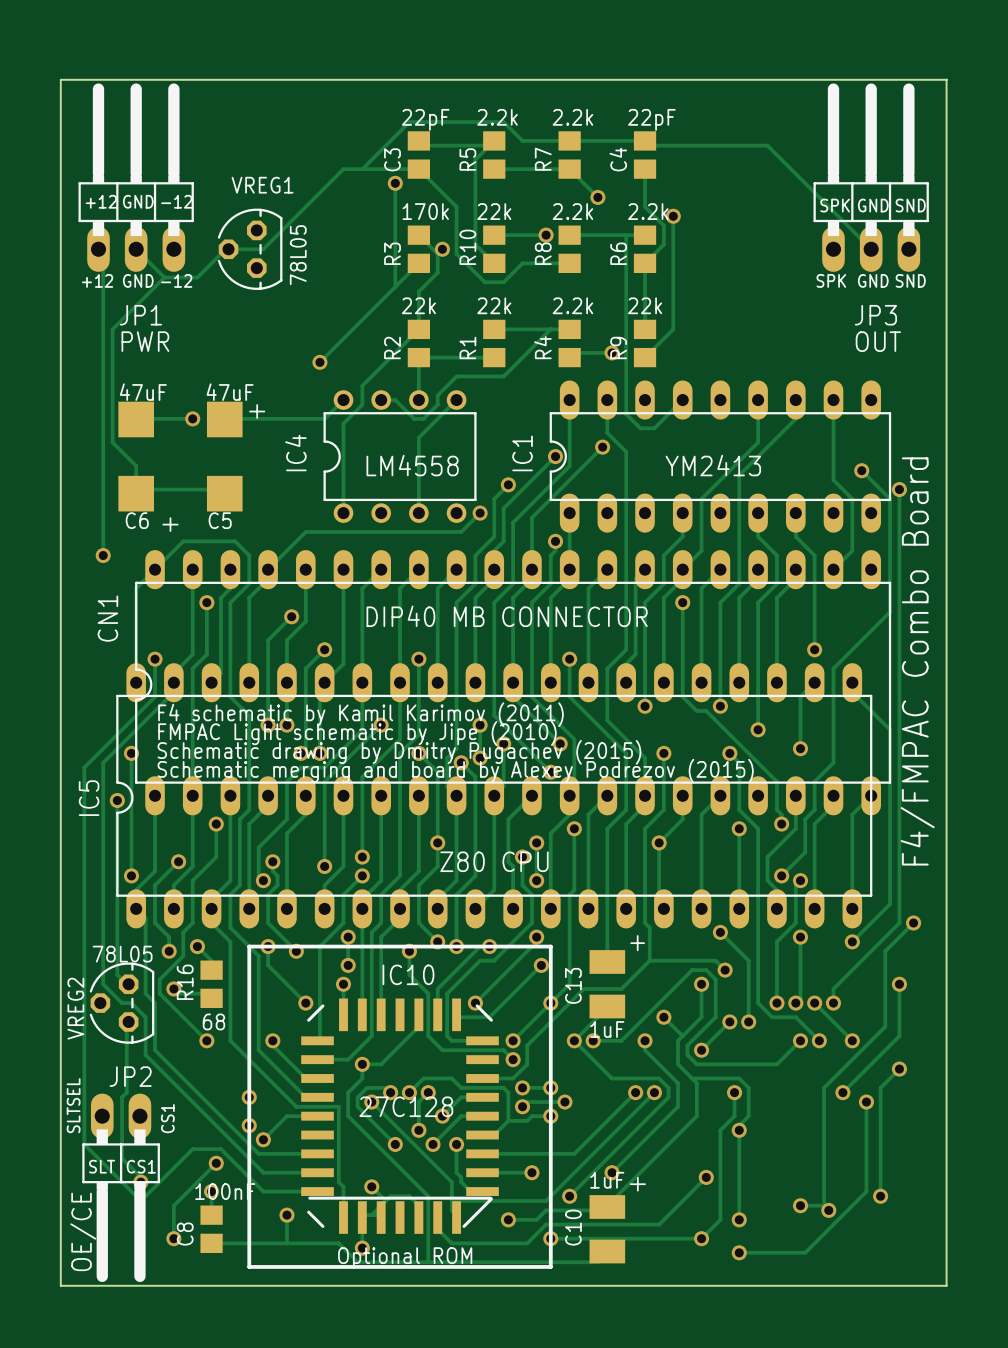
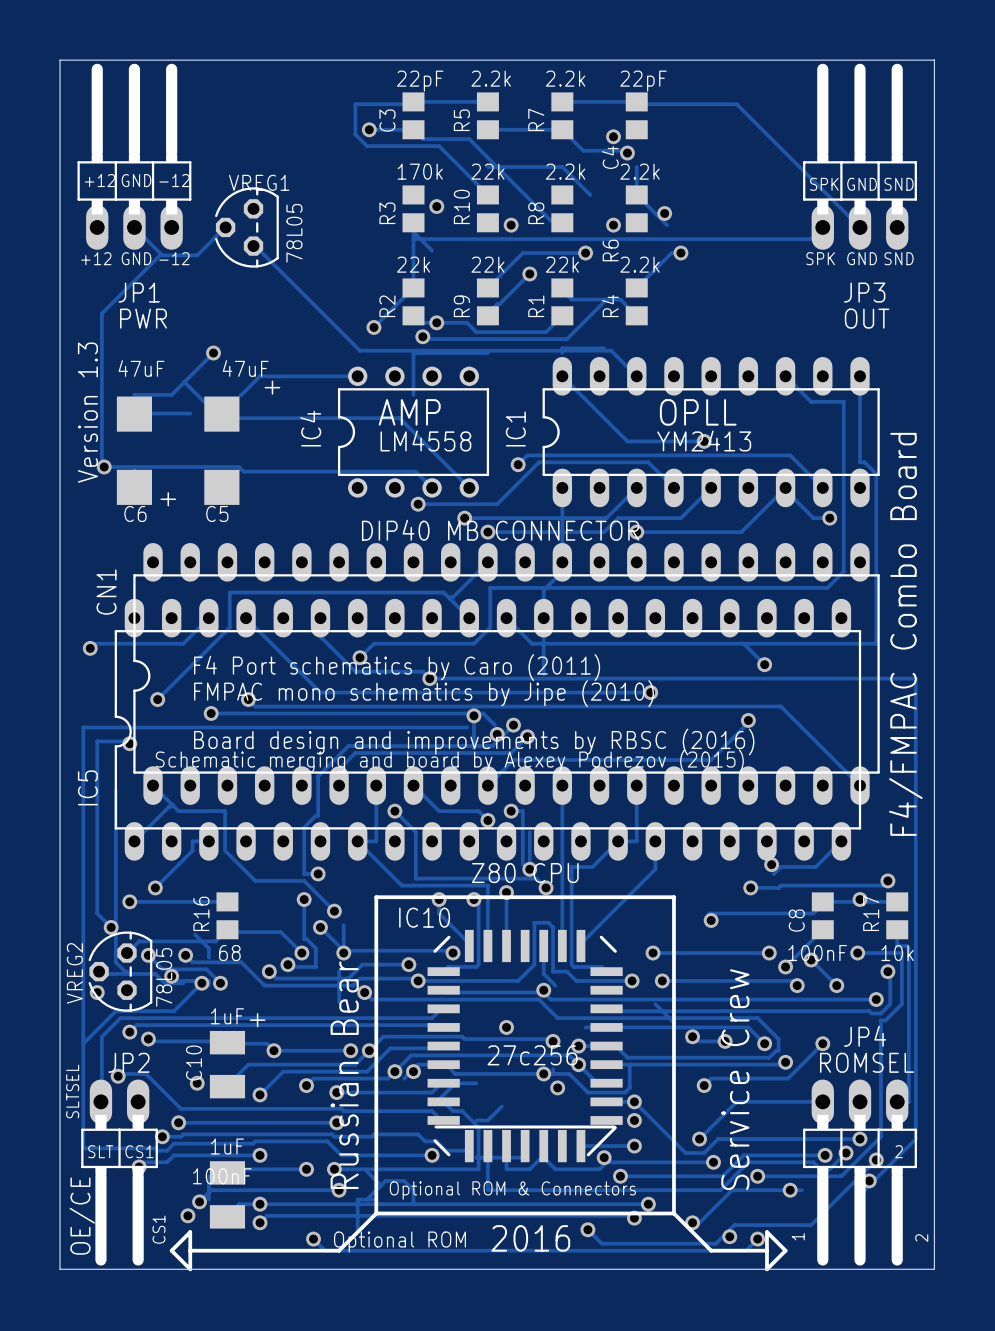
board edge: none -> (934, 60) (934, 78)
board edge: (60, 79) (946, 79) -> (60, 78) (60, 60) (934, 60)
text: none -> 2.2k (565, 78)
track: none -> (487, 101) (355, 104) (355, 134) (366, 146) (439, 146) (487, 194)
track: none -> (562, 101) (736, 104) (860, 227)
part: none -> (413, 115)
part: none -> (487, 115)
text position: 2.2k (497, 117) -> 2.2k (491, 78)
part: none -> (562, 115)
text: 2.2k (572, 117) -> none
part: none -> (636, 115)
text position: 22pF (425, 119) -> 22pF (420, 81)
text position: 22pF (651, 119) -> 22pF (643, 81)
track: none -> (369, 129) (413, 129) (422, 139) (469, 139) (550, 220) (562, 220) (562, 222)
via: none -> (369, 129)
track: none -> (487, 129) (562, 129) (583, 150) (625, 150) (627, 153)
via: none -> (613, 136)
track: (418, 140) (418, 145) (489, 145) (494, 140) (475, 159) (475, 244) (489, 258) (494, 258) (494, 263) -> none
part: (418, 155) -> none
part: (494, 155) -> none
part: (569, 155) -> none
via: none -> (627, 153)
part: (645, 155) -> none
text position: C3 (392, 159) -> C3 (387, 120)
text position: R5 (467, 159) -> R5 (461, 120)
text position: R7 (543, 159) -> R7 (536, 119)
track: (362, 169) (409, 122) (503, 122) (522, 140) (645, 140) (645, 145) (767, 145) (871, 249) -> none
text: none -> 22k (487, 171)
text: none -> 2.2k (565, 171)
text: none -> 2.2k (639, 171)
part position: (136, 177) -> (134, 156)
part position: (871, 177) -> (860, 156)
track: (395, 183) (395, 286) -> none
via: (395, 183) -> none
via: (597, 197) -> none
track: (645, 199) (645, 206) (663, 225) (663, 244) (645, 263) (645, 317) -> (636, 197) (639, 197) (666, 225)
text position: +12 (101, 201) -> +12 (100, 180)
text position: GND (138, 201) -> GND (136, 180)
text position: -12 (176, 201) -> -12 (174, 180)
text position: SPK (835, 205) -> SPK (824, 184)
text position: GND (873, 205) -> GND (862, 184)
text position: SND (910, 205) -> SND (899, 184)
via: none -> (436, 206)
part: none -> (413, 208)
text position: 170k (425, 211) -> 170k (420, 171)
text: 22k (494, 211) -> none
part: none -> (487, 208)
part: none -> (562, 208)
text: 2.2k (572, 211) -> none
part: none -> (636, 208)
text: 2.2k (648, 211) -> none
track: (673, 216) (673, 329) (649, 352) (645, 352) (645, 357) -> none
via: none -> (511, 225)
via: none -> (613, 225)
track: none -> (134, 227) (162, 255) (197, 255) (225, 227)
track: none -> (822, 227) (811, 239) (413, 239)
track: (494, 235) (546, 235) -> none
via: (546, 235) -> none
track: (569, 235) (645, 235) -> none
track: (626, 235) (626, 414) (640, 428) (654, 428) (682, 400) -> none
text position: R10 (467, 247) -> R10 (461, 206)
track: (98, 249) (103, 253) (103, 317) -> (161, 254) (101, 313)
track: (136, 249) (164, 277) -> none
part position: (250, 249) -> (246, 227)
track: (256, 249) (225, 249) (197, 277) (164, 277) -> none
track: (258, 249) (263, 249) (343, 169) (418, 169) (456, 206) (456, 253) (484, 282) (503, 282) -> (255, 246) (360, 350) (611, 350) (636, 376)
part: (418, 249) -> none
track: (442, 249) (437, 253) (437, 272) (418, 291) -> (413, 222) (413, 287)
via: (442, 249) -> none
part: (494, 249) -> none
part: (569, 249) -> none
part: (645, 249) -> none
text position: R3 (392, 253) -> R3 (387, 213)
text position: R8 (543, 253) -> R8 (536, 213)
text position: 78L05 (298, 255) -> 78L05 (294, 233)
via: none -> (585, 253)
track: none -> (680, 253) (671, 253) (636, 287)
via: none -> (680, 253)
track: (418, 263) (319, 362) -> none
track: (522, 263) (569, 263) -> (515, 260) (522, 253) (585, 253)
text: none -> 22k (487, 264)
text: none -> 22k (562, 264)
text: none -> 2.2k (639, 264)
track: (164, 277) (112, 329) (112, 442) (136, 465) (136, 473) -> none
track: none -> (529, 273) (499, 304) (497, 304) (487, 315)
via: none -> (529, 273)
text position: +12 (97, 280) -> +12 (96, 258)
text position: GND (138, 280) -> GND (136, 258)
text position: -12 (176, 280) -> -12 (174, 258)
text position: SPK (831, 280) -> SPK (820, 258)
text position: GND (873, 280) -> GND (862, 258)
text position: SND (910, 280) -> SND (899, 258)
track: none -> (562, 287) (571, 299) (620, 299) (634, 313) (636, 313)
track: (418, 294) (418, 329) (362, 385) (362, 404) (343, 423) (343, 513) -> (413, 290) (411, 290) (373, 327)
track: none -> (606, 299) (566, 339) (425, 339) (422, 336)
text position: 22k (418, 305) -> 22k (413, 264)
part: none -> (413, 301)
text: 22k (494, 305) -> none
part: none -> (487, 301)
part: none -> (562, 301)
text: 2.2k (572, 305) -> none
text: 22k (645, 305) -> none
part: none -> (636, 301)
text position: JP1 (140, 315) -> JP1 (139, 292)
text position: JP3 (875, 315) -> JP3 (864, 292)
track: none -> (413, 315) (420, 322) (466, 322) (476, 332) (546, 332) (562, 315)
via: none -> (436, 322)
track: (494, 329) (569, 329) -> none
track: (550, 329) (503, 376) (456, 376) (437, 395) (437, 404) (423, 418) (414, 418) (395, 400) (381, 400) -> none
via: none -> (373, 327)
text position: PWR (145, 341) -> PWR (143, 318)
via: none -> (422, 336)
text position: OUT (878, 341) -> OUT (867, 318)
part: (418, 343) -> none
part: (494, 343) -> none
part: (569, 343) -> none
part: (645, 343) -> none
text position: R2 (392, 347) -> R2 (387, 306)
text position: R1 (467, 347) -> R1 (536, 306)
text position: R4 (542, 347) -> R4 (610, 305)
text position: R9 (618, 347) -> R9 (461, 306)
via: (612, 352) -> none
track: none -> (213, 353) (171, 394) (134, 395)
via: none -> (213, 353)
via: (319, 362) -> none
track: none -> (357, 376) (260, 376) (240, 395)
track: none -> (562, 376) (627, 441) (704, 441)
track: none -> (785, 376) (811, 401) (843, 401) (843, 571) (827, 587) (490, 587) (490, 627) (473, 643) (373, 643) (360, 657)
track: none -> (860, 376) (860, 462) (864, 462) (876, 473) (876, 643) (744, 644)
track: none -> (184, 382) (220, 418) (399, 418) (469, 487)
text position: 47uF (143, 392) -> 47uF (141, 368)
text position: 47uF (230, 392) -> 47uF (245, 368)
track: (343, 400) (324, 418) (224, 419) -> none
track: (456, 400) (418, 437) (418, 513) -> none
track: (569, 400) (569, 465) (513, 522) (513, 583) (494, 602) (494, 715) (550, 772) -> none
track: (607, 400) (607, 433) (626, 451) (626, 649) (607, 668) (607, 720) (645, 758) (645, 795) -> none
track: (758, 400) (758, 442) (701, 498) (701, 550) (682, 569) (682, 579) (663, 597) (663, 682) -> none
track: (795, 400) (795, 418) (739, 475) (739, 583) (720, 602) (720, 706) -> none
track: (833, 400) (833, 480) (852, 498) (852, 550) (833, 569) -> none
text position: + (257, 411) -> + (272, 387)
text: none -> Version 1.3 (87, 412)
text: none -> AMP (409, 412)
text: none -> OPLL (698, 412)
via: (192, 418) -> none
track: (602, 447) (531, 517) (531, 579) (513, 597) (513, 696) (560, 743) -> none
via: (602, 447) -> none
via: none -> (704, 441)
text position: IC4 (295, 453) -> IC4 (310, 428)
text position: IC1 (522, 453) -> IC1 (515, 429)
part position: (400, 456) -> (413, 432)
track: (555, 456) (503, 508) (503, 541) (494, 550) (494, 579) (475, 597) (475, 682) -> none
via: (555, 456) -> none
part position: (720, 456) -> (711, 432)
text position: LM4558 (412, 465) -> LM4558 (425, 440)
text position: YM2413 (713, 465) -> YM2413 (704, 440)
track: none -> (518, 464) (527, 455) (790, 455) (822, 487)
via: none -> (518, 464)
track: (861, 470) (890, 498) (890, 612) (833, 668) (833, 762) (814, 781) (814, 809) (805, 819) (805, 852) (781, 875) -> none
via: (861, 470) -> none
track: (103, 473) (103, 555) -> (101, 466) (239, 466) (243, 471) (415, 471) (432, 487)
via: none -> (104, 466)
track: (508, 484) (494, 498) (494, 536) (475, 555) (475, 583) (456, 602) (456, 748) (447, 758) (447, 786) (456, 795) (456, 880) (437, 899) (437, 908) -> none
via: (508, 484) -> none
track: (136, 489) (221, 489) (224, 493) -> none
track: (899, 489) (899, 923) (833, 988) (833, 1003) -> none
via: (899, 489) -> none
track: none -> (636, 487) (606, 518) (464, 518)
track: none -> (673, 487) (648, 462) (539, 462) (497, 504) (418, 504)
track: none -> (711, 487) (680, 518) (618, 518) (604, 532) (487, 532)
via: none -> (418, 504)
track: (480, 513) (461, 531) (305, 531) (268, 569) (268, 579) (249, 597) (249, 682) -> none
via: (480, 513) -> none
track: (682, 513) (682, 536) (663, 555) (663, 583) (645, 602) (645, 706) -> none
track: (758, 513) (758, 536) (776, 555) (776, 583) (758, 602) (758, 729) -> none
track: (795, 513) (795, 536) (814, 555) (814, 649) -> none
text position: + (170, 524) -> + (168, 499)
via: none -> (464, 518)
track: none -> (829, 518) (813, 518) (785, 490) (785, 487) (741, 532) (636, 532)
via: none -> (829, 518)
via: none -> (487, 532)
via: none -> (636, 532)
track: (555, 541) (555, 550) (550, 555) (550, 583) (531, 602) (531, 696) (574, 739) (574, 791) (569, 795) -> none
via: (555, 541) -> none
via: (103, 555) -> none
track: (192, 569) (192, 654) (173, 673) (173, 692) (103, 762) (103, 984) (122, 1003) (131, 1003) (145, 1017) (145, 1054) (263, 1172) (317, 1172) -> none
track: (230, 569) (230, 588) (221, 597) (221, 673) (211, 682) -> none
track: (305, 569) (305, 621) (286, 640) (286, 725) -> none
track: (343, 569) (343, 663) (319, 687) (319, 753) -> none
track: (381, 569) (362, 588) (362, 729) (324, 767) (301, 767) (286, 781) (286, 819) (258, 847) (258, 875) (263, 880) -> none
track: (418, 569) (400, 588) (400, 739) (362, 776) (362, 857) -> none
track: (456, 569) (437, 588) (437, 682) -> none
track: none -> (487, 562) (453, 597) (449, 598)
track: (607, 569) (588, 588) (588, 682) -> none
track: (645, 569) (635, 579) (635, 654) (626, 663) (626, 682) -> none
track: (720, 569) (701, 588) (701, 682) -> none
track: (758, 569) (758, 579) (739, 597) (739, 682) -> none
track: (795, 569) (795, 579) (776, 597) (776, 682) -> none
track: (206, 602) (206, 654) (192, 668) (192, 866) (173, 885) (173, 908) -> none
via: (206, 602) -> none
track: (682, 602) (682, 696) (696, 710) (706, 710) (776, 781) (776, 809) (781, 814) (781, 824) -> none
via: (682, 602) -> none
track: (291, 616) (268, 640) (268, 725) -> none
via: (291, 616) -> none
text position: DIP40 MB CONNECTOR (507, 616) -> DIP40 MB CONNECTOR (500, 530)
text position: CN1 (107, 618) -> CN1 (106, 592)
track: none -> (208, 618) (183, 643) (94, 643) (90, 648)
track: none -> (246, 618) (320, 692) (650, 692)
track: none -> (320, 618) (320, 636) (355, 671) (422, 671) (429, 678) (915, 678) (915, 1139) (862, 1192)
track: none -> (469, 618) (443, 592) (229, 592) (229, 627) (157, 699)
track: none -> (506, 618) (532, 643) (743, 643) (764, 664)
track: (324, 649) (305, 668) (305, 748) (301, 753) -> none
via: (324, 649) -> none
via: (814, 649) -> none
via: none -> (90, 648)
track: (155, 659) (155, 696) (84, 767) -> (466, 727) (83, 727) (83, 757)
via: (155, 659) -> none
track: (418, 659) (418, 734) (400, 753) (400, 875) (381, 894) (381, 923) (371, 932) (371, 1036) (348, 1059) (317, 1059) -> none
via: (418, 659) -> none
track: (569, 659) (569, 696) (626, 753) (626, 809) (607, 828) (607, 962) -> none
via: (569, 659) -> none
text position: F4/FMPAC Combo Board (917, 661) -> F4/FMPAC Combo Board (905, 634)
via: none -> (360, 657)
via: none -> (764, 664)
text: none -> F4 Port schematics by Caro (2011) (397, 667)
track: (136, 682) (136, 588) (183, 541) (235, 541) (249, 555) (249, 583) (230, 602) (230, 696) (249, 715) (249, 809) (239, 819) (239, 885) (230, 894) (230, 927) (258, 955) (258, 1050) (305, 1097) (317, 1097) -> none
track: (814, 682) (800, 696) (800, 748) -> none
track: (852, 682) (852, 692) (890, 729) (890, 904) (852, 941) -> none
via: none -> (429, 678)
text: none -> FMPAC mono schematics by Jipe (2010) (423, 693)
via position: (645, 706) -> (650, 692)
via: (720, 706) -> none
via: none -> (157, 699)
via: none -> (248, 699)
text: F4 schematic by Kamil Karimov (2011) (360, 714) -> none
track: none -> (211, 713) (483, 713) (494, 725)
via: none -> (211, 713)
via: (268, 725) -> none
via: (286, 725) -> none
track: (381, 725) (324, 781) (324, 866) -> none
via: (381, 725) -> none
text: FMPAC Light schematic by Jipe (2010) (357, 733) -> none
track: none -> (513, 725) (492, 746) (348, 746) (318, 776) (318, 815) (304, 827) (304, 873) (318, 873)
via: none -> (513, 725)
track: (503, 743) (503, 786) -> (750, 720) (711, 760) (513, 760) (497, 776)
via: (560, 743) -> none
via: none -> (527, 736)
via: (800, 748) -> none
track: none -> (125, 741) (97, 741) (97, 913) (111, 927)
text: none -> Board design and improvements by RBSC (2016) (474, 742)
text: Schematic drawing by Dmitry Pugachev (2015) (399, 752) -> none
track: (131, 753) (131, 875) -> none
via: (301, 753) -> none
via: (319, 753) -> none
track: (418, 753) (437, 772) (437, 866) (418, 885) (418, 923) (437, 941) -> none
via: (418, 753) -> none
track: (663, 753) (663, 809) (645, 828) -> (636, 794) (636, 818)
via: (663, 753) -> none
track: (729, 753) (739, 762) (739, 809) (758, 828) (758, 1003) (772, 1017) (795, 1017) (819, 1040) -> none
via: (729, 753) -> none
via: (480, 758) -> none
track: (461, 762) (475, 776) (475, 875) (456, 894) (456, 946) -> none
via: (461, 762) -> none
via: (550, 772) -> none
track: (155, 795) (155, 871) (136, 890) (136, 908) (145, 918) (145, 993) (155, 1003) (155, 1050) (258, 1153) (317, 1153) -> (153, 785) (178, 811) (225, 811) (225, 850) (255, 880) (304, 880) (334, 911)
track: (230, 795) (230, 880) (211, 899) (211, 923) (230, 941) -> (127, 953) (139, 941) (215, 941) (227, 929)
track: (268, 795) (268, 805) (249, 824) (249, 908) -> none
track: (305, 795) (305, 814) (286, 833) (286, 908) -> none
track: (343, 795) (343, 866) (324, 885) (324, 908) -> (339, 785) (339, 769) (355, 753) (511, 753) (527, 736)
track: (418, 795) (418, 871) (400, 890) (400, 918) (381, 937) (381, 1014) -> (413, 785) (439, 811) (478, 811) (487, 820)
track: (494, 795) (494, 890) (475, 908) -> none
part position: (494, 795) -> (487, 729)
track: (531, 795) (508, 819) (508, 861) (513, 866) (513, 904) -> none
track: (607, 795) (588, 814) (588, 908) -> none
track: (682, 795) (682, 819) (659, 842) (659, 904) (663, 908) -> none
track: (720, 795) (701, 814) (701, 908) -> none
track: (795, 795) (795, 828) (767, 857) (767, 880) (776, 890) (776, 908) -> none
track: (833, 795) (833, 805) (814, 824) (814, 908) -> none
track: (871, 795) (852, 814) (852, 908) -> (860, 785) (780, 706) (255, 706) (248, 699)
via: (117, 800) -> none
track: (645, 805) (626, 824) (626, 908) -> none
track: (569, 814) (550, 833) (550, 908) -> none
track: none -> (172, 805) (169, 806) (134, 841)
track: none -> (394, 811) (415, 832) (415, 878) (536, 878) (546, 887)
via: none -> (394, 811)
track: none -> (511, 811) (522, 811) (522, 864)
via: none -> (511, 811)
track: (216, 824) (216, 857) (192, 880) (192, 923) (183, 932) (183, 955) (159, 979) (159, 993) (206, 1040) -> none
via: (216, 824) -> none
via: (781, 824) -> none
track: (574, 828) (574, 890) (569, 894) -> (562, 804) (562, 883)
via: (574, 828) -> none
track: (739, 828) (739, 908) -> none
via: (739, 828) -> none
via: none -> (487, 820)
via: (437, 842) -> none
via: (536, 842) -> none
via: (659, 842) -> none
track: none -> (208, 841) (192, 841) (192, 850) (155, 887)
track: (381, 852) (381, 880) (362, 899) (362, 1014) -> (376, 841) (357, 841) (401, 885) (487, 885) (487, 945)
track: (645, 852) (645, 923) (649, 927) (649, 960) -> (636, 841) (618, 841) (592, 866) (571, 866) (571, 964) (573, 966) (601, 966) (606, 971)
track: none -> (655, 841) (655, 869) (580, 943) (580, 945)
track: none -> (841, 841) (815, 866) (780, 866) (773, 873)
via: (362, 857) -> none
track: (522, 857) (522, 885) (531, 894) (531, 923) (494, 960) (480, 960) (447, 993) (447, 1036) (451, 1040) (482, 1040) -> none
via: (522, 857) -> none
track: (178, 861) (155, 885) (155, 923) (169, 937) (169, 951) -> none
via: (178, 861) -> none
track: (272, 861) (272, 871) (277, 875) (277, 885) (268, 894) (268, 923) (296, 951) -> none
via: (272, 861) -> none
text position: Z80 CPU (494, 861) -> Z80 CPU (525, 873)
via position: (324, 866) -> (318, 873)
via: (131, 875) -> none
track: (362, 875) (343, 894) (343, 923) (319, 946) (319, 960) -> (304, 899) (304, 939) (315, 948)
via: (362, 875) -> none
via: (263, 880) -> none
track: (800, 880) (795, 885) (795, 923) (776, 941) (776, 1003) -> none
via: (800, 880) -> none
track: none -> (887, 880) (883, 885) (780, 885) (778, 887) (750, 887)
via: none -> (887, 880)
via: none -> (155, 887)
via: none -> (546, 887)
via: none -> (750, 887)
via: none -> (506, 892)
track: none -> (506, 897) (506, 945)
via: none -> (304, 899)
track: none -> (439, 899) (439, 913) (469, 943) (469, 945)
via: none -> (439, 899)
track: none -> (473, 899) (478, 899) (478, 964) (476, 966) (448, 966) (443, 971)
via: none -> (473, 899)
via: none -> (860, 899)
track: none -> (129, 901) (227, 901)
via: none -> (129, 901)
track: none -> (897, 901) (822, 901) (813, 913) (708, 913)
via: none -> (334, 911)
track: (913, 923) (885, 951) (885, 1026) (824, 1087) (824, 1205) -> none
via: (913, 923) -> none
text: none -> R17 (871, 913)
part: none -> (822, 915)
part: none -> (897, 915)
track: (720, 932) (748, 960) (748, 1021) -> none
text: none -> C8 (796, 920)
via: (348, 937) -> none
track: (536, 937) (536, 941) (475, 1003) -> none
via: (536, 937) -> none
track: (800, 937) (800, 998) (795, 1003) -> none
via: (800, 937) -> none
via: none -> (111, 927)
track: none -> (320, 927) (343, 950) (450, 950) (453, 953)
via: none -> (320, 927)
via: (437, 941) -> none
track: none -> (822, 929) (785, 966)
via: (852, 941) -> none
track: none -> (897, 929) (897, 946) (906, 946) (908, 948) (908, 1101) (897, 1101)
text: + (637, 943) -> none
track: (230, 944) (230, 1040) (296, 1106) (338, 1106) (338, 1182) (343, 1186) (343, 1217) -> (227, 932) (280, 932) (301, 953)
via: (197, 946) -> none
track: (268, 946) (268, 965) (305, 1003) -> none
via: (268, 946) -> none
via: (456, 946) -> none
track: (489, 946) (480, 946) (437, 988) (437, 1014) -> none
via: (489, 946) -> none
via: (169, 951) -> none
via: (296, 951) -> none
track: (409, 951) (409, 974) (428, 993) (428, 1036) (442, 1050) -> (313, 1064) (355, 1064) (383, 1036) (436, 1036)
via: (409, 951) -> none
text rotation: 0° (122, 954) -> 90° counterclockwise (164, 977)
track: none -> (543, 945) (543, 973) (555, 985)
track: (569, 958) (569, 984) (513, 1040) -> none
track: (649, 960) (715, 960) (725, 970) -> none
track: (649, 960) (621, 988) (583, 988) (527, 1045) (527, 1064) (513, 1078) (482, 1078) -> none
via: none -> (301, 953)
via: none -> (453, 953)
track: (541, 965) (489, 1017) (456, 1017) (456, 1014) -> none
via: (541, 965) -> none
track: none -> (653, 953) (769, 953)
via: none -> (653, 953)
via: none -> (769, 953)
text: none -> 100nF (817, 953)
track: none -> (857, 953) (901, 953) (901, 1004) (885, 1020) (880, 1020) (880, 1136) (841, 1176) (757, 1176)
via: none -> (857, 953)
text: none -> 10k (897, 953)
track: none -> (148, 955) (162, 969) (206, 969) (220, 983)
via: none -> (148, 955)
track: none -> (185, 955) (192, 962) (241, 962) (264, 985) (353, 985) (360, 978) (518, 980) (534, 964) (534, 922) (548, 922) (553, 927) (553, 971) (566, 971) (576, 980) (632, 980)
via: none -> (185, 955)
via: (725, 970) -> none
track: none -> (811, 960) (836, 985)
via: none -> (811, 960)
text position: IC10 (408, 974) -> IC10 (424, 917)
via: none -> (287, 964)
track: none -> (408, 964) (362, 964) (348, 978) (276, 978) (269, 971)
via: none -> (408, 964)
track: (319, 979) (319, 1040) (317, 1040) -> (315, 966) (290, 966) (287, 964)
via: none -> (785, 966)
track: none -> (887, 966) (890, 966) (890, 1004) (880, 1013) (871, 1013) (869, 1011) (611, 1011) (606, 1008)
text position: R16 (185, 982) -> R16 (201, 913)
track: none -> (99, 971) (101, 973) (155, 973) (164, 983) (183, 983)
part position: (211, 984) -> (227, 915)
via: none -> (269, 971)
via: (343, 984) -> none
part: (607, 984) -> none
track: (701, 984) (701, 1017) (678, 1040) (678, 1064) (696, 1083) (696, 1116) (607, 1205) (607, 1210) (546, 1210) (536, 1219) -> (648, 1204) (529, 1204)
via: (701, 984) -> none
track: (899, 984) (899, 1036) (842, 1092) -> none
text: C13 (573, 985) -> none
via: none -> (418, 980)
via: none -> (632, 980)
track: none -> (662, 980) (792, 980) (797, 985)
via: none -> (662, 980)
track: none -> (201, 983) (173, 1011) (115, 1011) (83, 1043)
via: none -> (201, 983)
via: none -> (220, 983)
via: none -> (797, 985)
via: none -> (836, 985)
part position: (121, 1003) -> (120, 971)
via: (305, 1003) -> none
track: none -> (443, 990) (446, 992) (543, 992) (550, 999) (876, 999)
via: (475, 1003) -> none
via: (776, 1003) -> none
via: (795, 1003) -> none
track: (814, 1003) (852, 1040) -> none
via: (814, 1003) -> none
via: (833, 1003) -> none
via: none -> (97, 992)
track: none -> (364, 992) (371, 999) (539, 999) (557, 1018) (757, 1018) (778, 1039) (778, 1050) (769, 1057) (627, 1057) (615, 1046) (578, 1046)
via: none -> (364, 992)
track: (607, 1006) (574, 1040) (612, 1078) (614, 1078) -> none
text position: VREG2 (75, 1008) -> VREG2 (74, 973)
via: none -> (876, 999)
track: (418, 1014) (418, 1026) (381, 1064) (362, 1064) (362, 1078) (348, 1092) (348, 1116) (428, 1196) (428, 1262) -> none
via: (663, 1017) -> none
track: (128, 1021) (126, 1021) (126, 1092) (122, 1097) (122, 1158) (140, 1177) (140, 1182) -> none
text position: 68 (213, 1021) -> 68 (229, 953)
track: none -> (443, 1008) (432, 1018) (120, 1018) (101, 1036) (100, 1101)
track: (729, 1021) (701, 1050) -> none
via: (729, 1021) -> none
via: (748, 1021) -> none
text: none -> 1uF (227, 1016)
text: 1uF (607, 1029) -> none
text: none -> + (257, 1020)
via: (206, 1040) -> none
track: (272, 1040) (272, 1045) (305, 1078) -> (227, 1085) (248, 1064) (301, 1064)
via: (272, 1040) -> none
track: none -> (443, 1027) (439, 1025) (136, 1025) (129, 1032)
via: (574, 1040) -> none
via: (593, 1040) -> none
track: (621, 1040) (692, 970) (706, 970) (715, 979) (715, 1017) (687, 1045) (687, 1054) (696, 1064) (776, 1064) (800, 1040) -> (613, 1027) (748, 1027) (764, 1043)
track: (645, 1040) (645, 1050) (678, 1083) (678, 1106) (612, 1172) -> none
via: (645, 1040) -> none
via: (800, 1040) -> none
via: (819, 1040) -> none
via: (852, 1040) -> none
via: none -> (129, 1032)
text: none -> JP4 (865, 1036)
track: (468, 1050) (503, 1050) (513, 1059) -> (462, 1036) (464, 1039) (550, 1039) (553, 1041)
track: none -> (148, 1039) (150, 1041) (227, 1041) (227, 1043) (267, 1043) (273, 1050) (350, 1050)
via: none -> (148, 1039)
via: none -> (553, 1041)
track: none -> (687, 1041) (725, 1041)
via: none -> (725, 1041)
via: none -> (764, 1043)
track: none -> (822, 1043) (787, 1078) (711, 1078) (704, 1085)
via: none -> (822, 1043)
track: none -> (443, 1046) (439, 1048) (390, 1048) (366, 1071) (283, 1071) (260, 1094)
via: (513, 1059) -> none
via: none -> (578, 1046)
via: none -> (273, 1050)
via: none -> (350, 1050)
via: (362, 1064) -> none
via: none -> (369, 1050)
text: none -> 27c256 (532, 1055)
track: (899, 1069) (880, 1087) (880, 1196) -> none
via: (899, 1069) -> none
text: none -> C10 (193, 1063)
via: none -> (785, 1062)
text: none -> ROMSEL (867, 1062)
part: none -> (227, 1064)
via: none -> (578, 1064)
track: none -> (629, 1064) (629, 1087) (625, 1092) (587, 1092) (569, 1073) (543, 1073)
track: (659, 1078) (668, 1087) (668, 1097) (569, 1196) -> (650, 1064) (683, 1064)
track: (739, 1078) (748, 1087) (748, 1116) (739, 1125) (739, 1219) -> (729, 1064) (783, 1064) (785, 1062)
track: none -> (553, 1069) (553, 1073)
via: none -> (394, 1071)
via: none -> (413, 1071)
track: (503, 1087) (508, 1092) (508, 1120) (527, 1120) (531, 1116) (550, 1116) -> (497, 1073) (515, 1073)
via: (522, 1087) -> none
text: none -> Russian Bear (344, 1075)
track: none -> (118, 1076) (120, 1073) (146, 1073) (180, 1108) (432, 1111) (443, 1120)
via: none -> (118, 1076)
track: (390, 1092) (385, 1087) (367, 1087) (357, 1097) (357, 1106) (395, 1144) -> none
via: (390, 1092) -> none
via: (409, 1092) -> none
track: (428, 1092) (418, 1102) (418, 1130) -> none
via: (428, 1092) -> none
track: (635, 1092) (574, 1153) (482, 1153) -> none
via: (635, 1092) -> none
track: (654, 1092) (546, 1200) (451, 1200) -> none
via: (654, 1092) -> none
track: (734, 1092) (734, 1116) (720, 1130) (720, 1219) (701, 1238) (550, 1238) (550, 1262) -> none
via: (734, 1092) -> none
via: (842, 1092) -> none
text: none -> Service Crew (735, 1079)
via: none -> (197, 1083)
via: (249, 1097) -> none
track: none -> (443, 1083) (432, 1092) (336, 1092)
track: none -> (606, 1083) (597, 1083) (569, 1055) (411, 1055) (387, 1078) (313, 1078) (306, 1085)
via: none -> (306, 1085)
via: none -> (704, 1085)
track: (371, 1102) (451, 1182) (451, 1210) (456, 1217) -> none
via: (371, 1102) -> none
track: (560, 1102) (527, 1102) (522, 1106) -> none
track: (866, 1102) (866, 1191) (805, 1252) (739, 1252) -> none
via: (866, 1102) -> none
via: none -> (336, 1092)
text: 27C128 (406, 1106) -> none
via: (522, 1106) -> none
via: none -> (260, 1094)
track: (317, 1116) (286, 1116) (263, 1139) -> none
part position: (400, 1116) -> (525, 1046)
via: (442, 1116) -> none
track: none -> (443, 1101) (453, 1111) (462, 1111) (478, 1127) (478, 1169) (334, 1169)
track: (482, 1116) (461, 1116) (433, 1144) -> none
via: (550, 1116) -> none
track: none -> (606, 1101) (634, 1101) (685, 1153) (704, 1153) (718, 1139) (860, 1139)
via: none -> (634, 1101)
track: none -> (822, 1101) (736, 1101) (699, 1139)
text position: CS1 (167, 1118) -> CS1 (159, 1229)
via: (249, 1125) -> none
via: (418, 1130) -> none
via: (739, 1130) -> none
via: none -> (634, 1120)
track: none -> (178, 1122) (336, 1122)
via: none -> (178, 1122)
via: none -> (336, 1122)
via: (263, 1139) -> none
track: (84, 1144) (136, 1196) (145, 1196) (192, 1149) -> (162, 1136) (180, 1136) (183, 1134) (190, 1134)
track: none -> (83, 1129) (83, 1148) (155, 1148) (157, 1150) (167, 1150) (173, 1143) (327, 1141) (341, 1155) (432, 1155)
via: (395, 1144) -> none
via: (433, 1144) -> none
track: (456, 1144) (456, 1172) (461, 1177) (461, 1182) (470, 1191) (482, 1191) -> none
via: (456, 1144) -> none
track: (221, 1149) (263, 1191) (317, 1191) -> (218, 1134) (332, 1134) (334, 1136) (418, 1134) (425, 1141) (436, 1141) (446, 1150) (469, 1150) (469, 1146)
via: none -> (162, 1136)
via: none -> (699, 1139)
via: none -> (860, 1139)
track: none -> (580, 1146) (634, 1146)
via: none -> (634, 1146)
text: none -> 1uF (227, 1146)
track: none -> (487, 1146) (487, 1190) (720, 1190) (748, 1162) (813, 1162) (820, 1169) (829, 1169) (846, 1153)
track: none -> (506, 1146) (506, 1169) (529, 1169) (543, 1155)
track: none -> (543, 1146) (543, 1157) (555, 1169) (599, 1169) (606, 1162) (713, 1162)
track: (216, 1163) (173, 1205) (173, 1238) -> none
via: (216, 1163) -> none
text: none -> 2 (898, 1151)
via: none -> (846, 1153)
track: none -> (260, 1155) (173, 1155) (167, 1162) (136, 1162)
via: none -> (260, 1155)
via: none -> (432, 1155)
track: none -> (825, 1155) (743, 1155) (722, 1176) (620, 1176)
via: none -> (825, 1155)
via: (531, 1172) -> none
track: none -> (876, 1160) (811, 1225) (734, 1225) (715, 1243) (601, 1243) (587, 1229)
via: none -> (876, 1160)
track: (706, 1177) (659, 1224) (546, 1224) (527, 1243) (451, 1243) (437, 1229) (437, 1217) -> none
via: (706, 1177) -> none
via: none -> (713, 1162)
text: 1uF (607, 1180) -> none
track: none -> (306, 1169) (229, 1169) (227, 1172)
via: none -> (306, 1169)
via: none -> (334, 1169)
text: + (637, 1184) -> none
via: (371, 1186) -> none
part: none -> (860, 1172)
via: (211, 1191) -> none
via: none -> (620, 1176)
via: none -> (757, 1176)
via: (569, 1196) -> none
track: none -> (339, 1190) (211, 1190) (199, 1201)
via: none -> (339, 1190)
track: none -> (790, 1190) (732, 1190) (692, 1229)
track: (812, 1205) (824, 1205) -> none
text: none -> Optional ROM & Connectors (512, 1190)
part: none -> (227, 1194)
via: (828, 1210) -> none
track: (286, 1215) (286, 1243) -> none
via: (286, 1215) -> none
via: none -> (199, 1201)
via: none -> (260, 1204)
track: none -> (501, 1204) (239, 1204) (227, 1216)
via: (508, 1219) -> none
via: none -> (648, 1204)
via: (739, 1219) -> none
text: C10 (573, 1227) -> none
part: (211, 1229) -> none
line: none -> (376, 1213) (673, 1213)
line: none -> (376, 1213) (376, 897) (673, 897) (673, 1213)
part: (607, 1229) -> none
line: none -> (673, 1213) (711, 1250) (766, 1250)
via: none -> (187, 1215)
track: none -> (634, 1218) (632, 1215) (267, 1215) (260, 1222)
via: none -> (634, 1218)
text: C8 (185, 1234) -> none
via: (173, 1238) -> none
via: none -> (260, 1222)
via: (550, 1238) -> none
track: (211, 1243) (338, 1243) (357, 1262) (597, 1262) (607, 1251) -> none
via: none -> (587, 1229)
line: none -> (190, 1232) (171, 1250) (190, 1269) (190, 1232)
via: (362, 1248) -> none
line: none -> (766, 1232) (785, 1250) (766, 1269) (766, 1232)
text: none -> 1 (798, 1236)
text: none -> 2016 (530, 1238)
text: none -> 2 (921, 1238)
track: none -> (313, 1239) (325, 1250) (746, 1250) (757, 1239)
via: none -> (313, 1239)
via: none -> (757, 1239)
line: none -> (190, 1250) (246, 1250)
line: (249, 1266) (249, 946) (550, 946) (550, 1266) (343, 1266) -> (376, 1213) (339, 1250)

